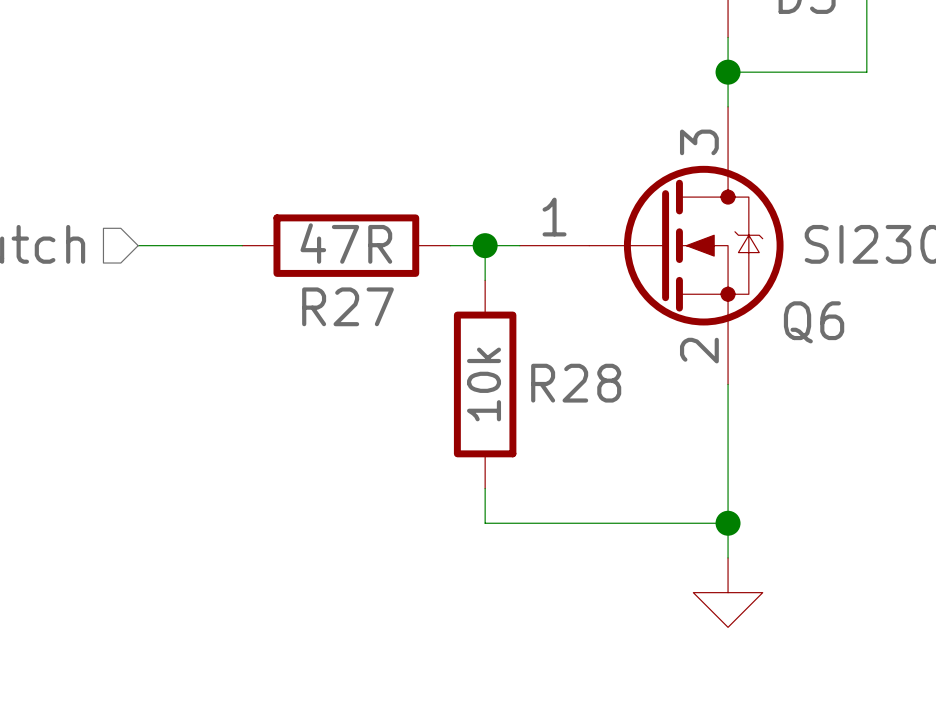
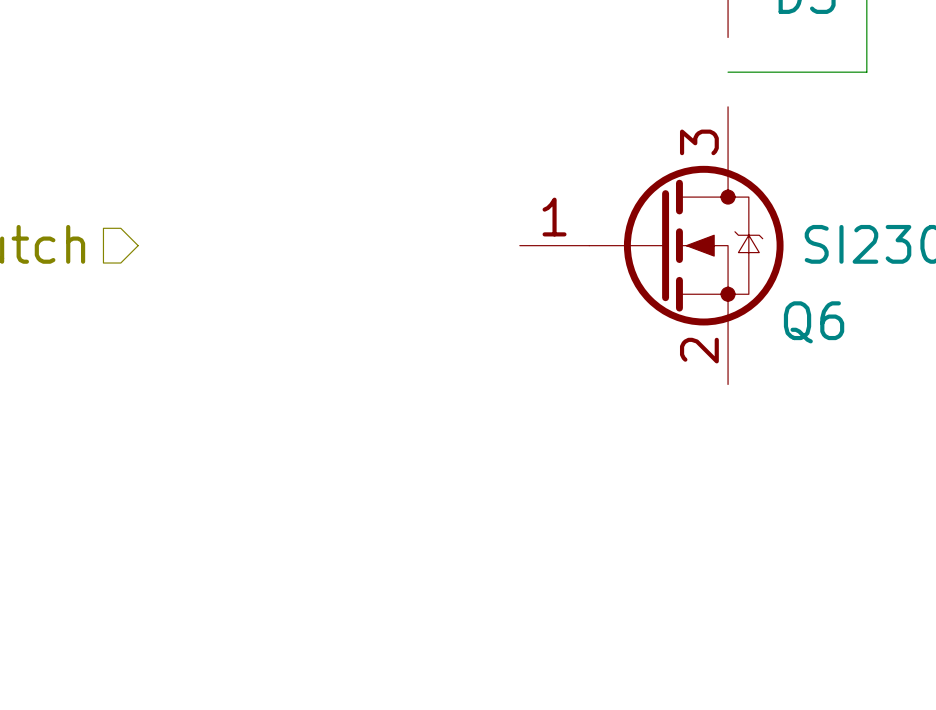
wire: (728, 37) (728, 106) -> none
junction: (728, 72) -> none
wire: (138, 245) (242, 245) -> none
R27: 47R (346, 245) -> none
wire: (450, 245) (519, 245) -> none
wire: (485, 245) (485, 280) -> none
junction: (485, 245) -> none
R28: 10k (485, 384) -> none
wire: (728, 384) (728, 557) -> none
wire: (485, 488) (485, 523) (728, 523) -> none
junction: (728, 523) -> none
power symbol: (728, 592) -> none

